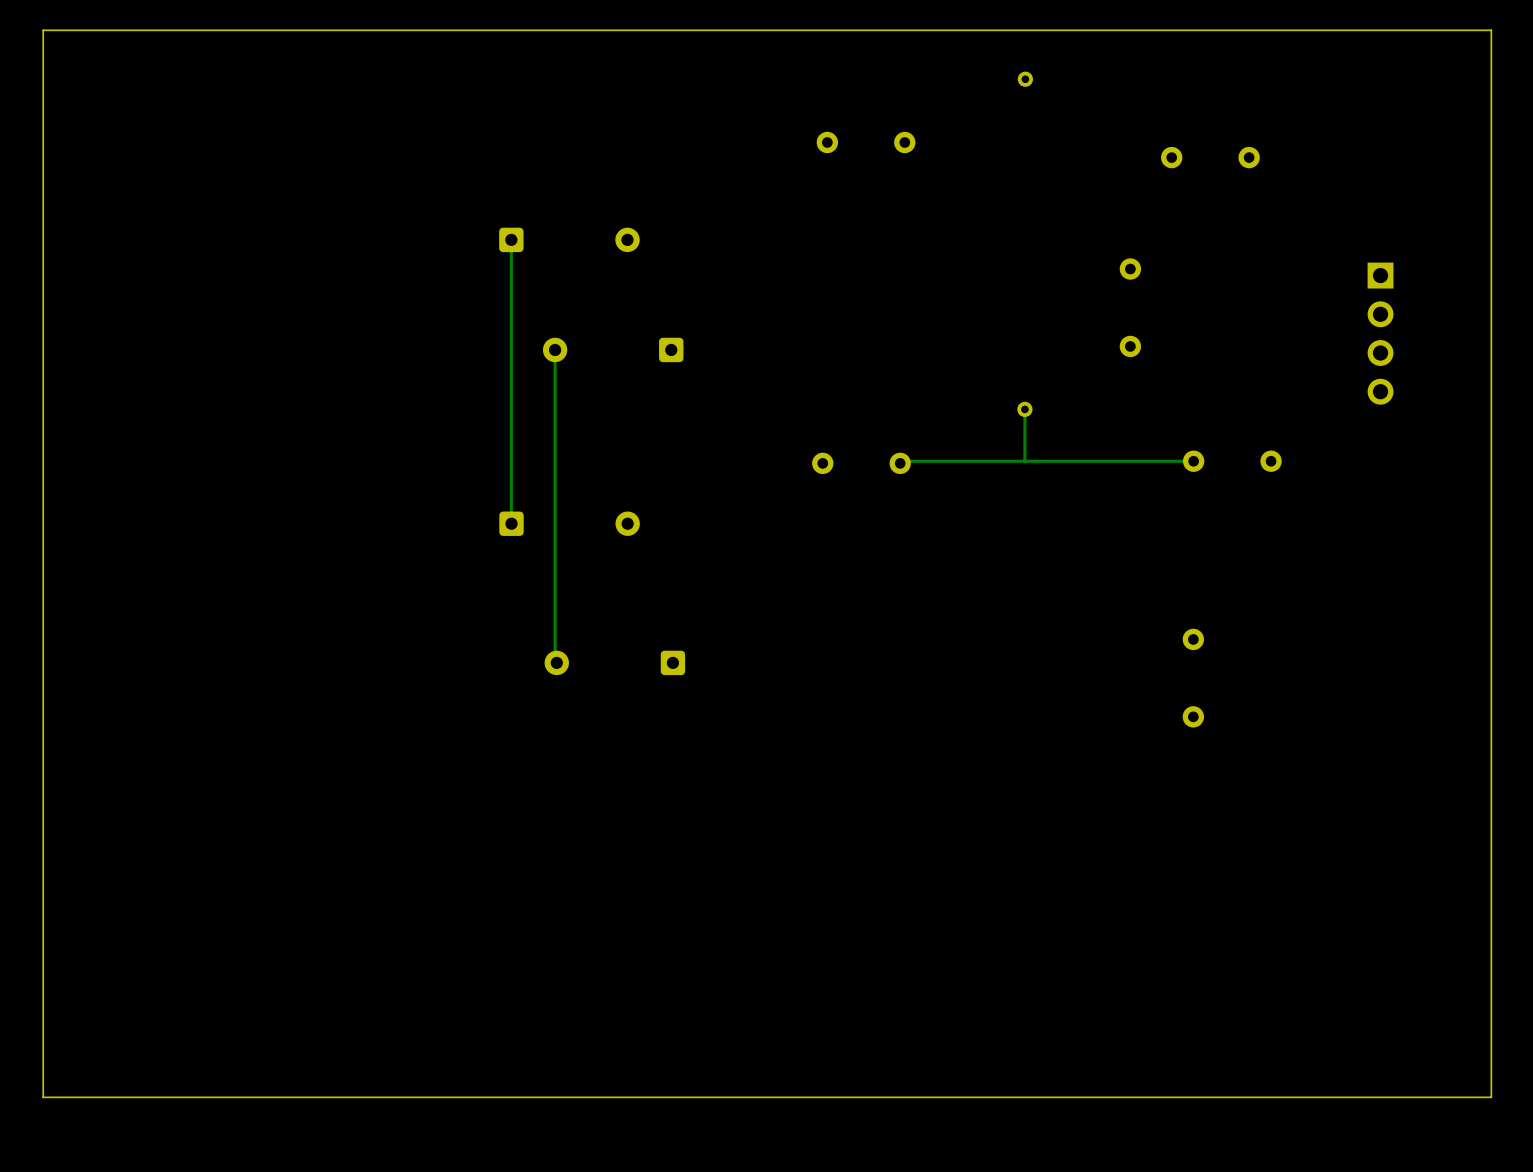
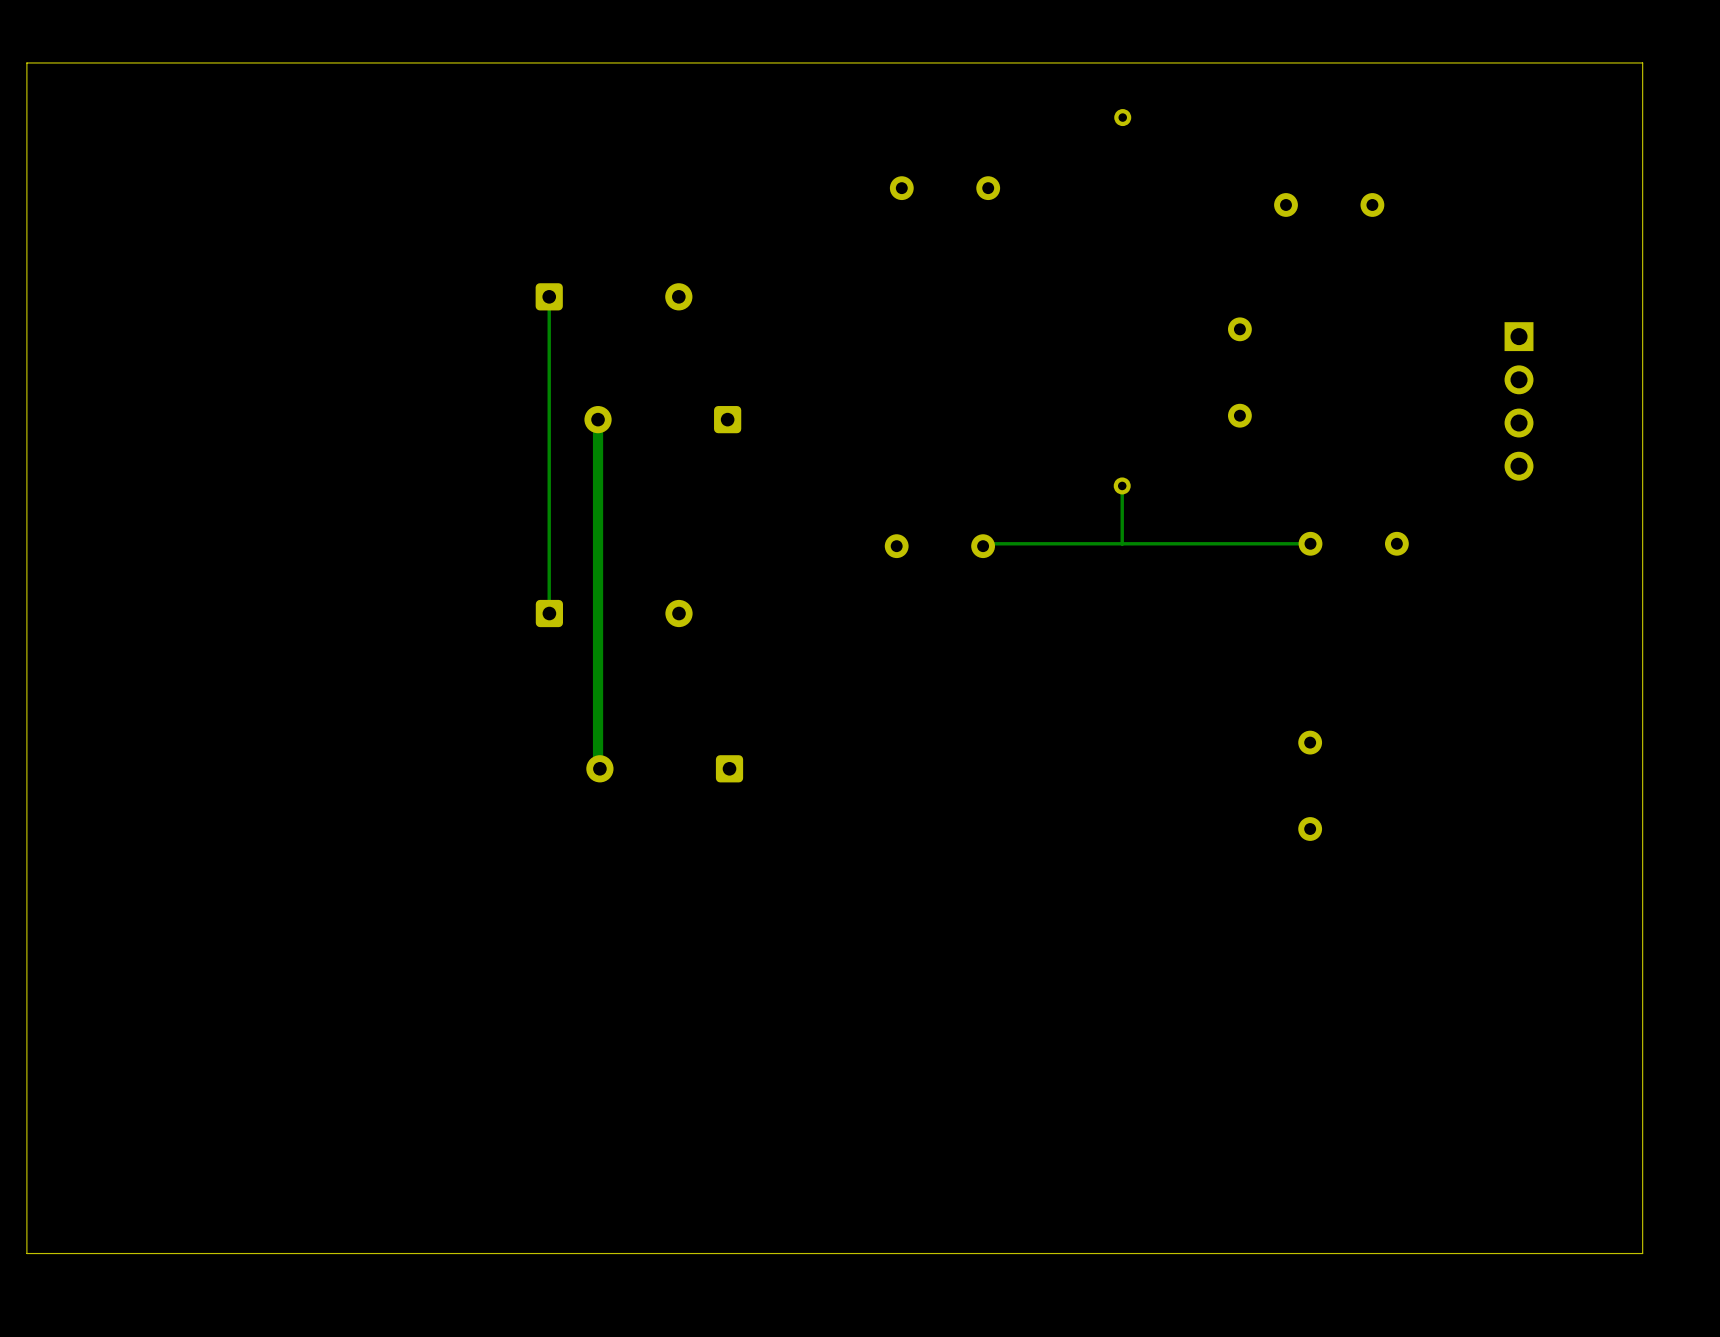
track width: thin (555, 349) (555, 661) -> thick (598, 419) (598, 766)

